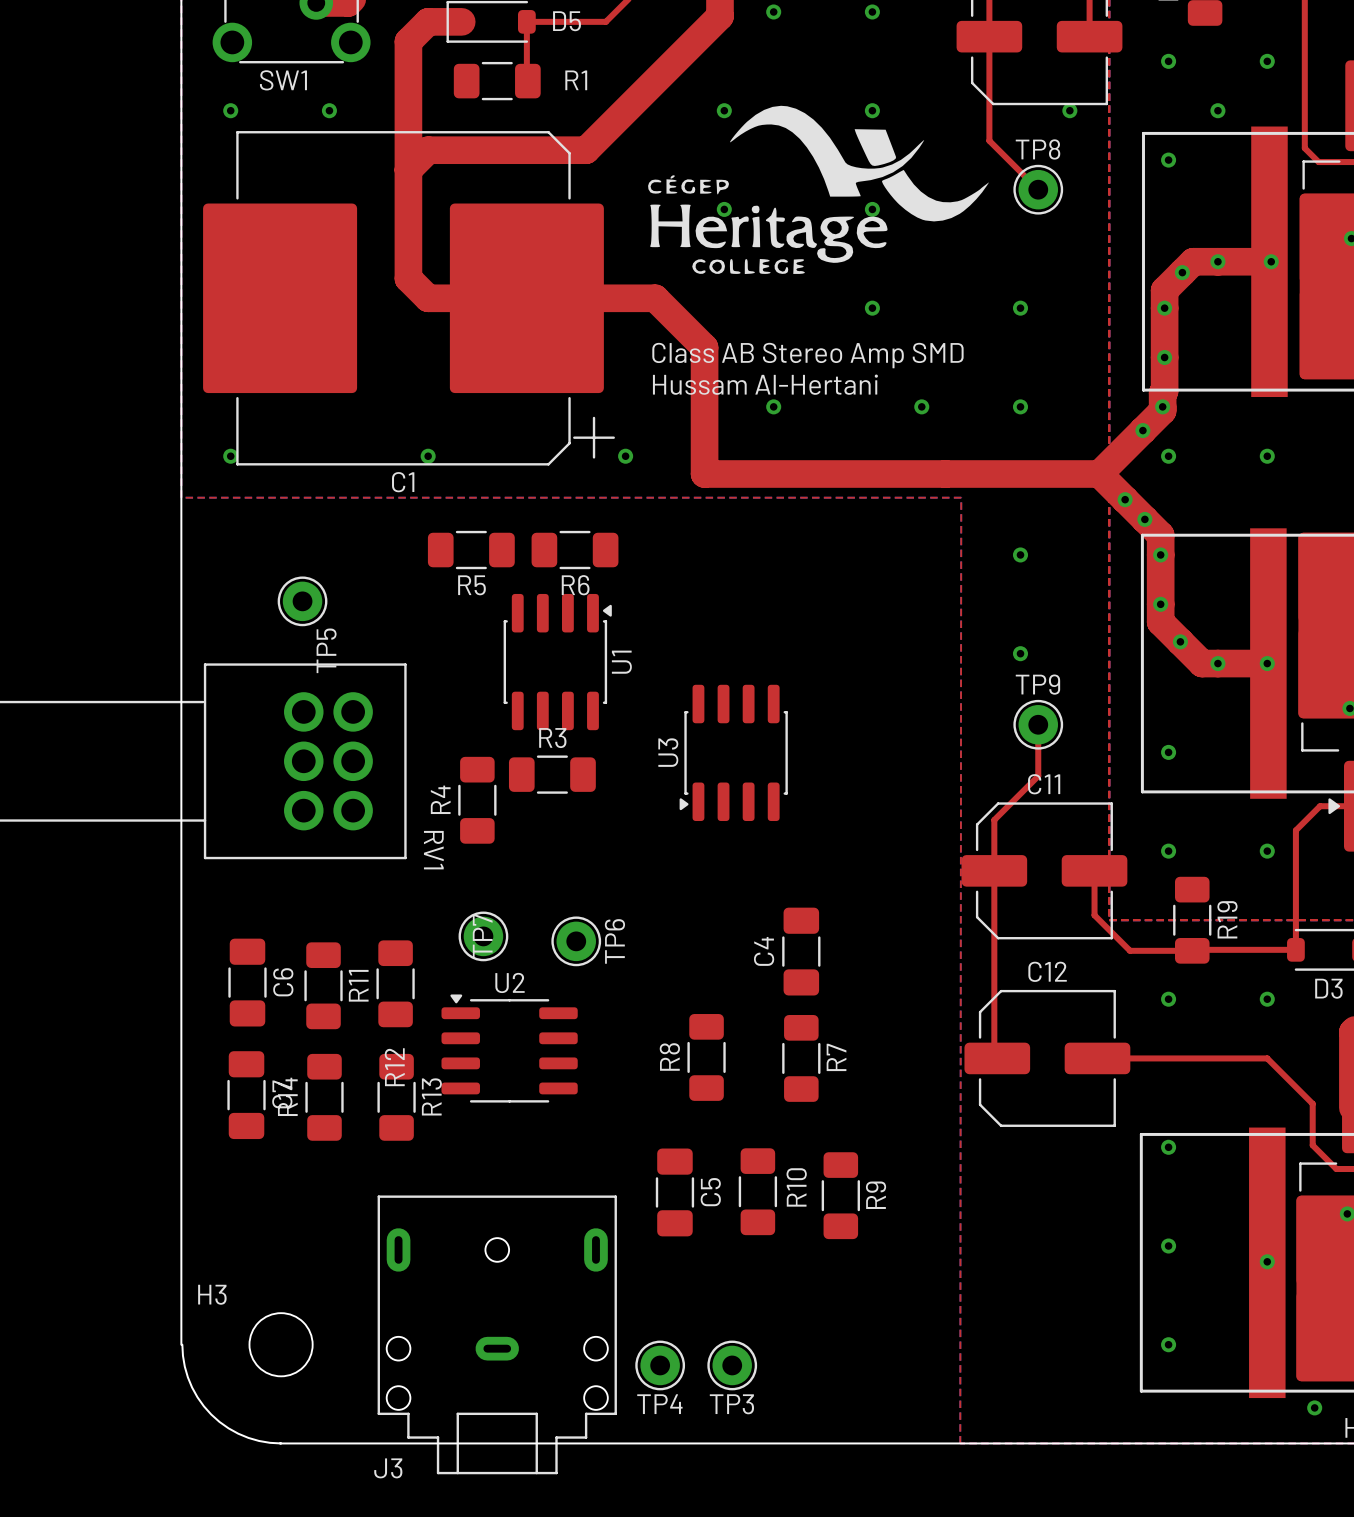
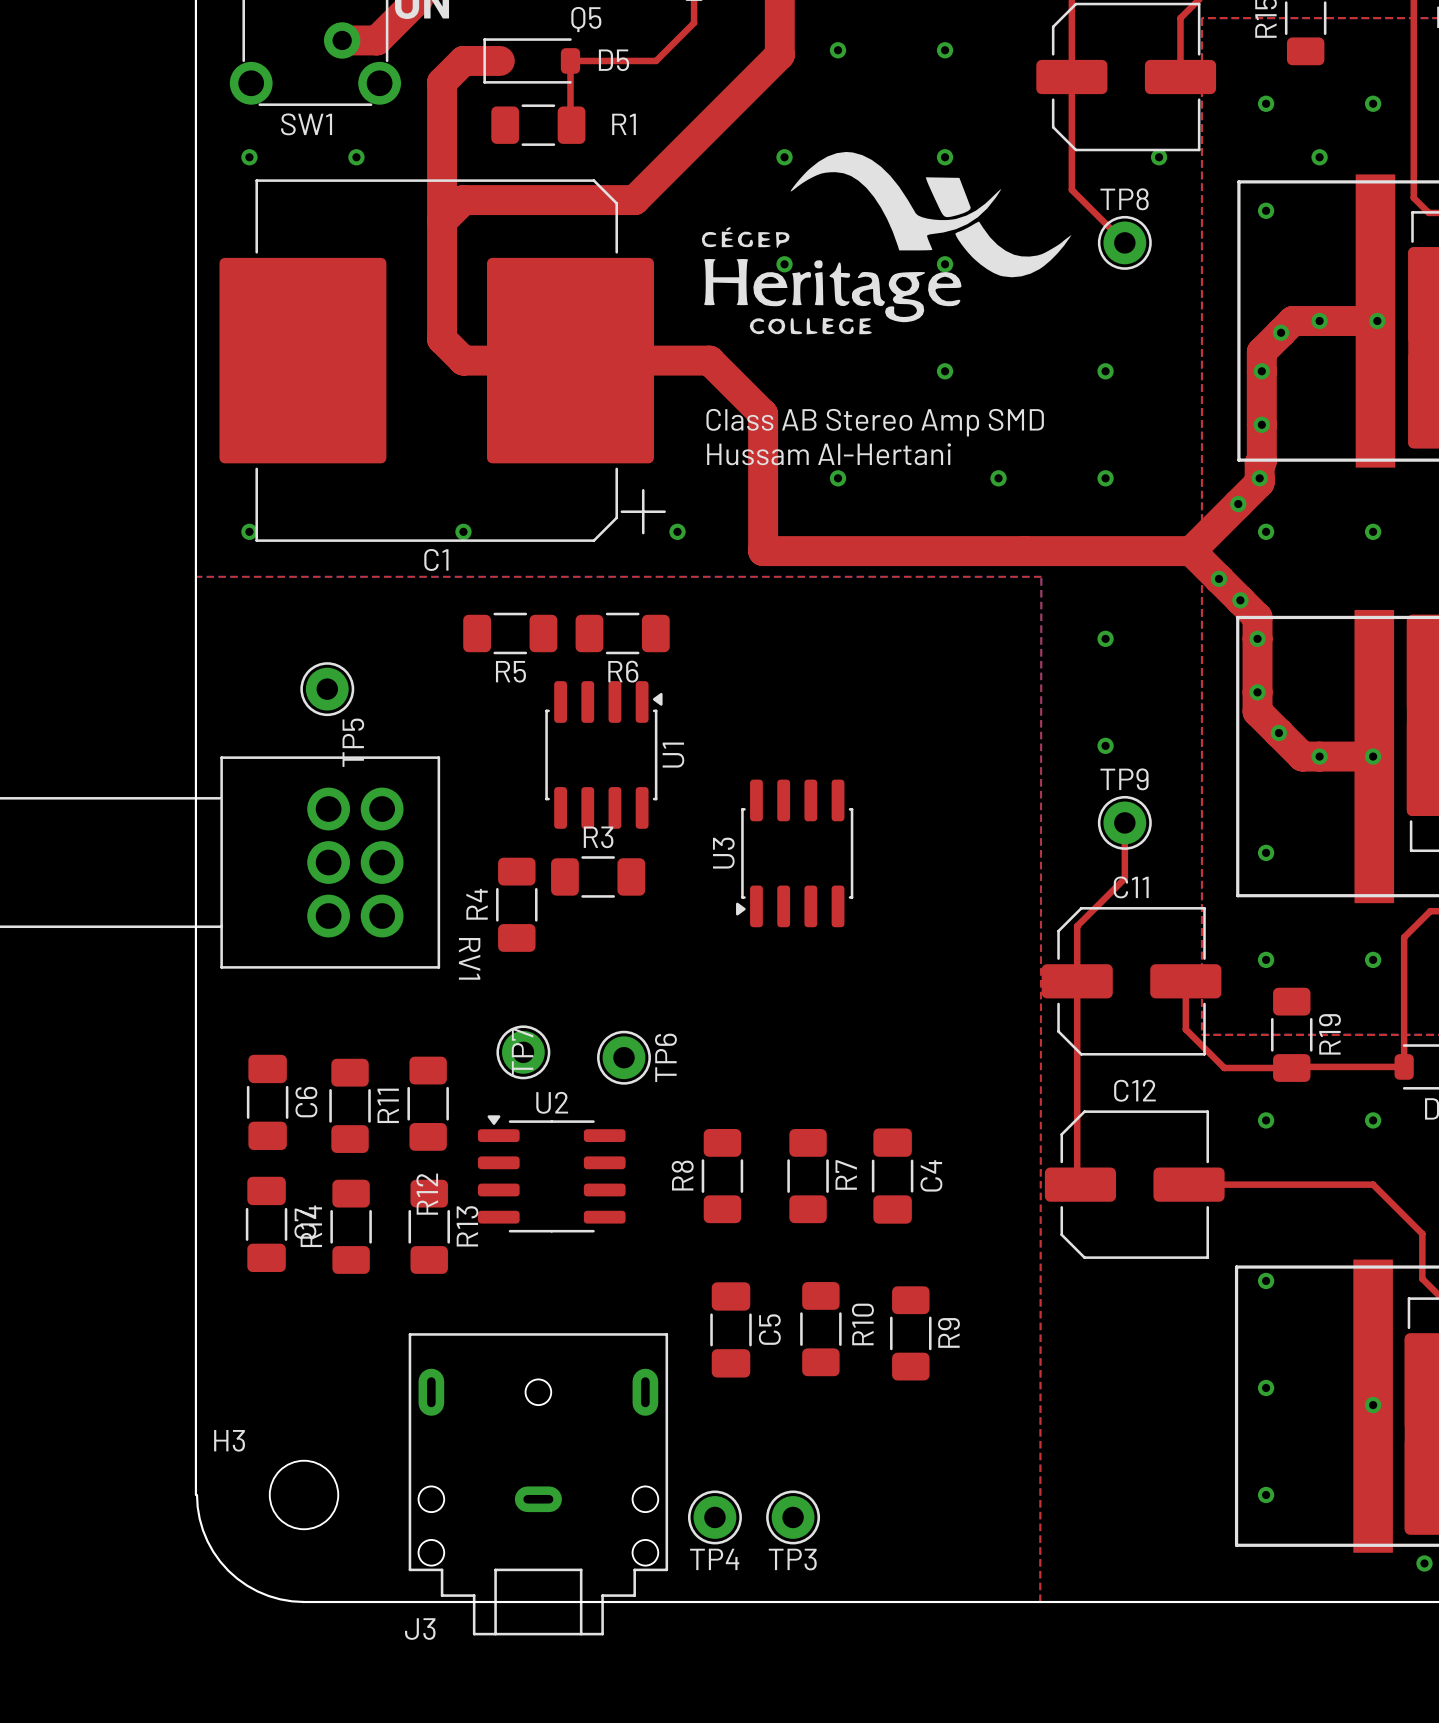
C4 name position: C4 (764, 951) -> C4 (931, 1175)
C4 position: (801, 951) -> (892, 1176)
R8 position: (706, 1057) -> (722, 1176)
R7 position: (801, 1058) -> (808, 1176)

